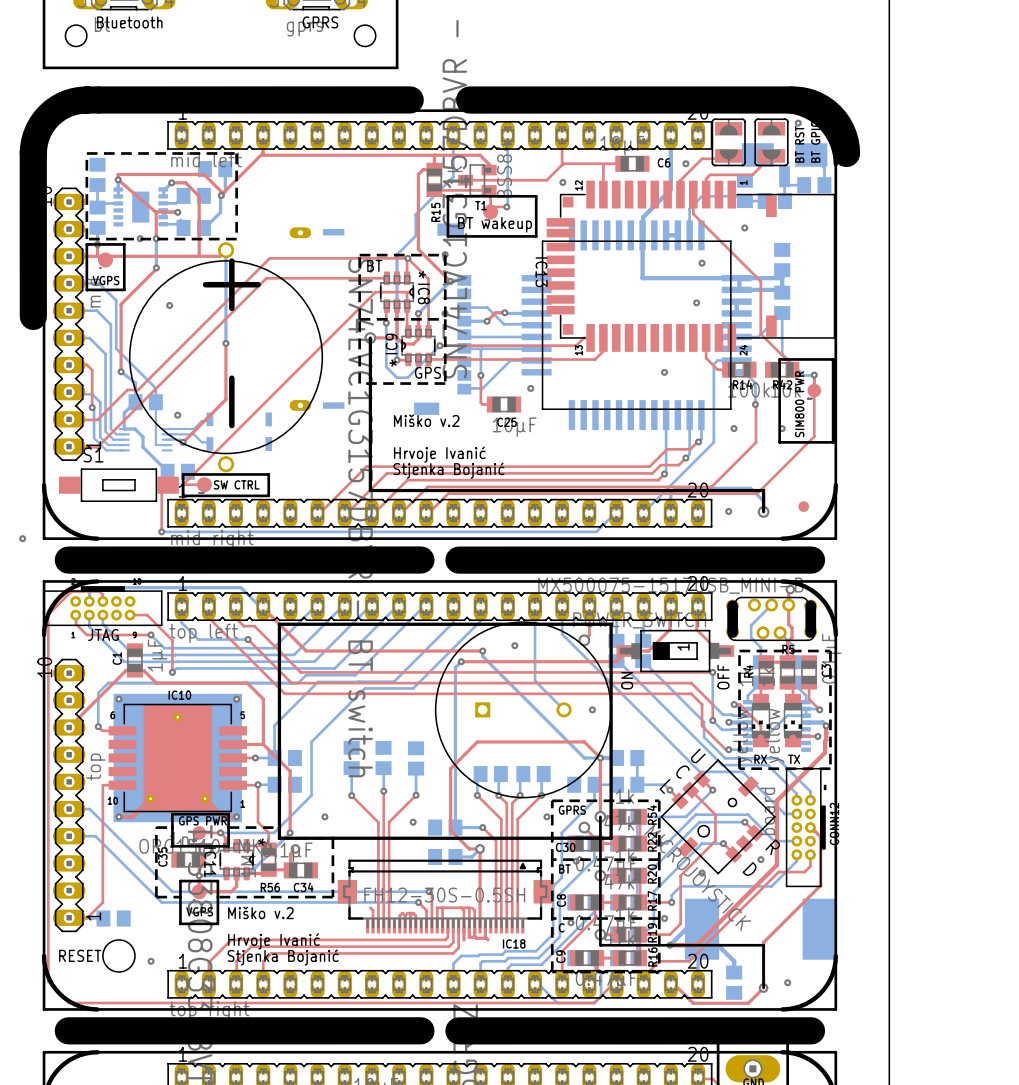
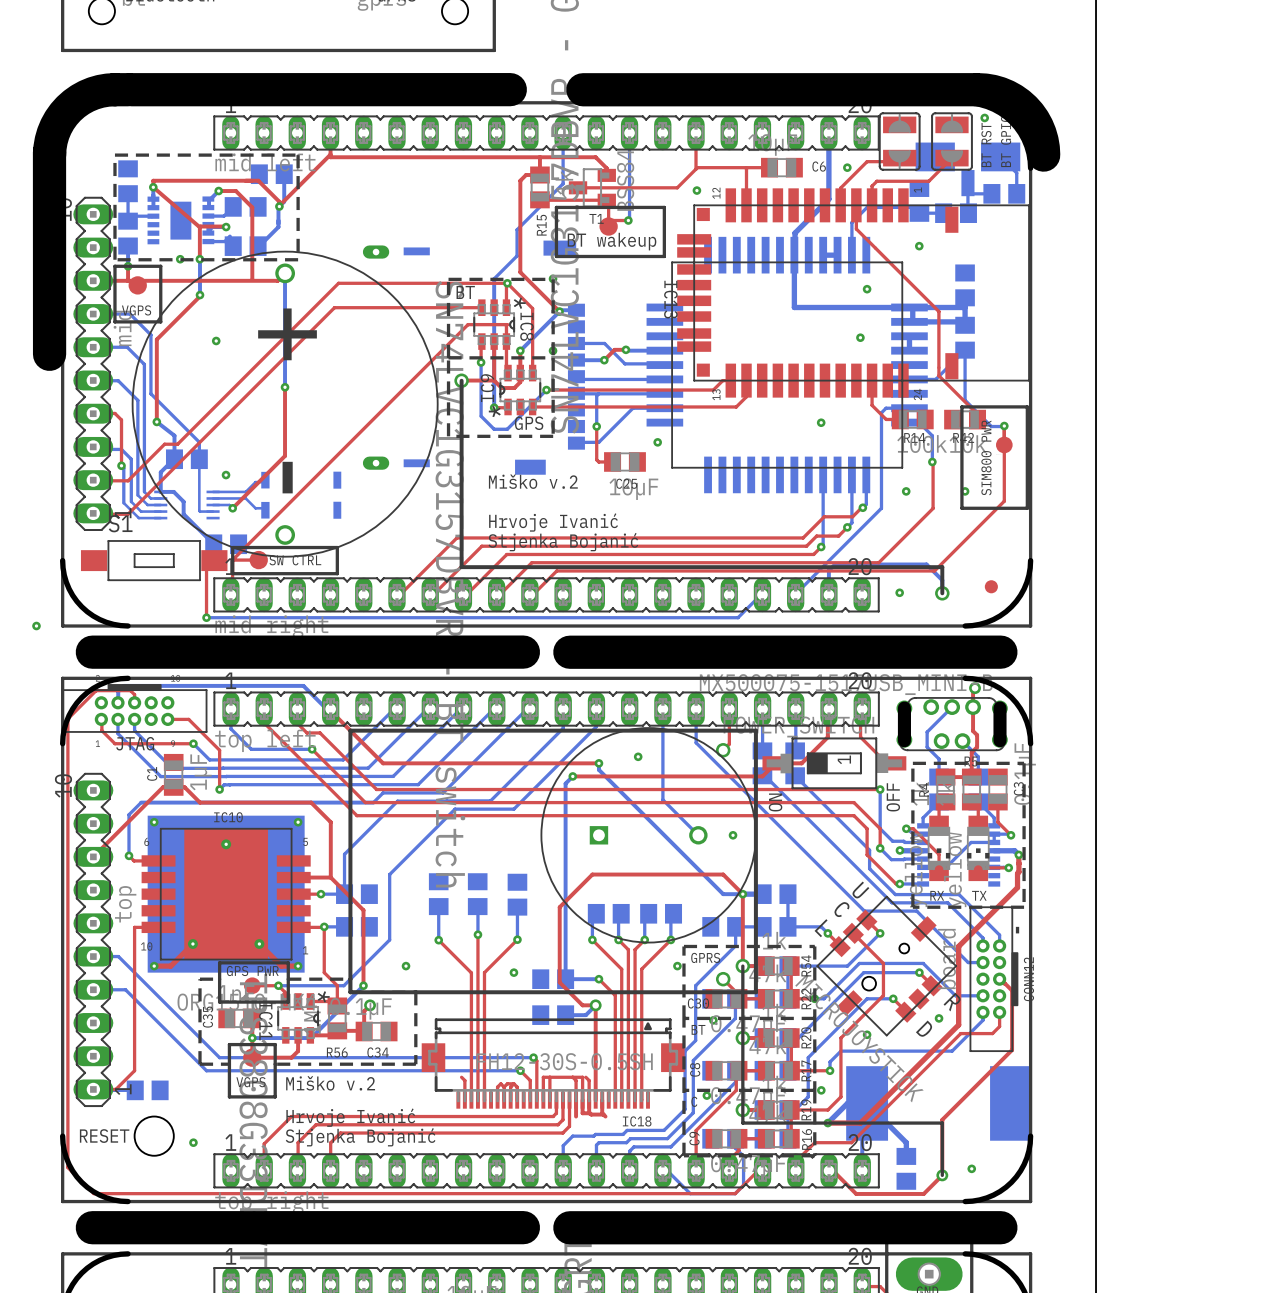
part footprint: [546, 180, 836, 352] -> [677, 188, 1030, 398]
part footprint: [129, 242, 324, 473] -> [131, 250, 439, 558]
part footprint: [108, 693, 247, 823] -> [141, 815, 311, 973]

